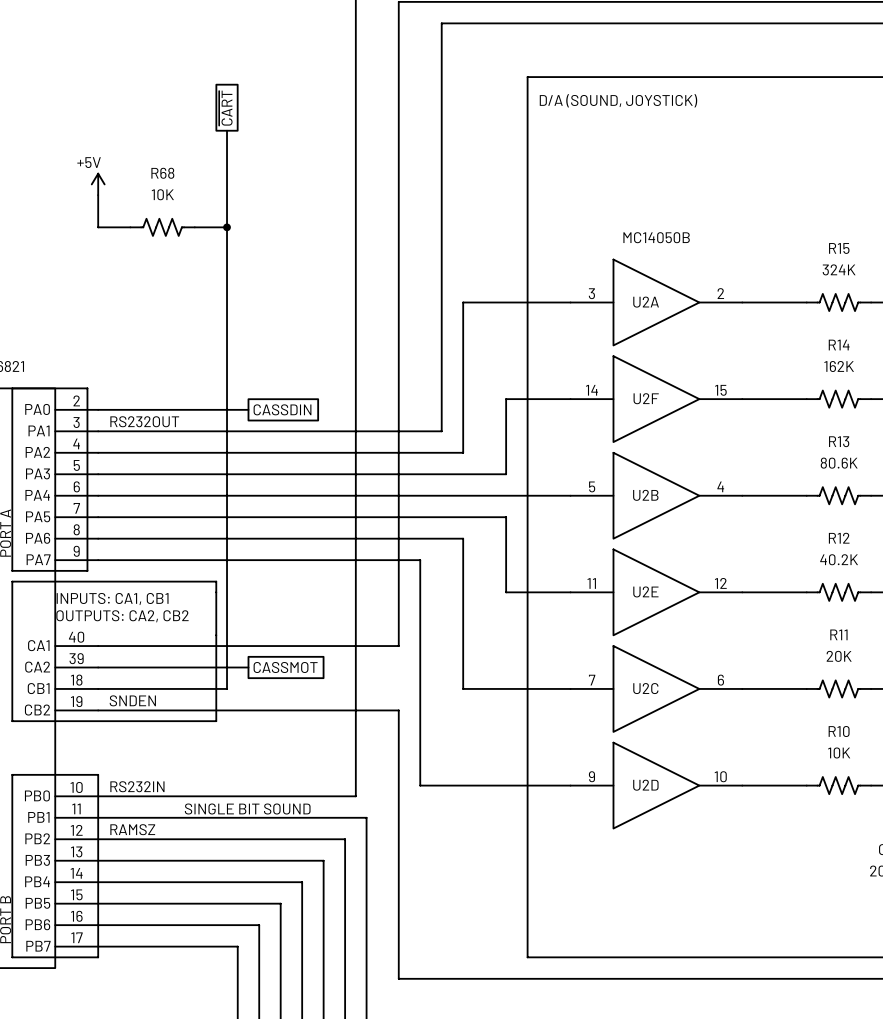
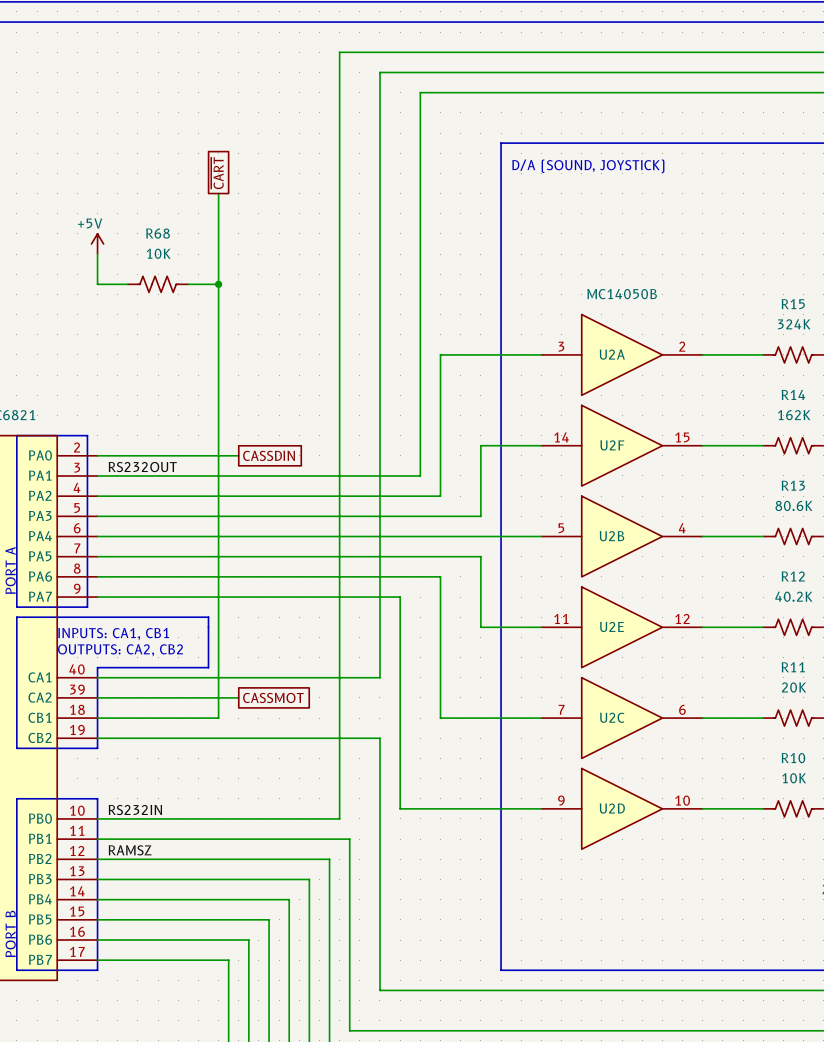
line: (216, 635) (216, 721) (98, 721) -> (208, 667) (97, 667) (97, 748)
label: SNDEN (132, 700) -> none
text: SINGLE BIT SOUND (247, 809) -> none

